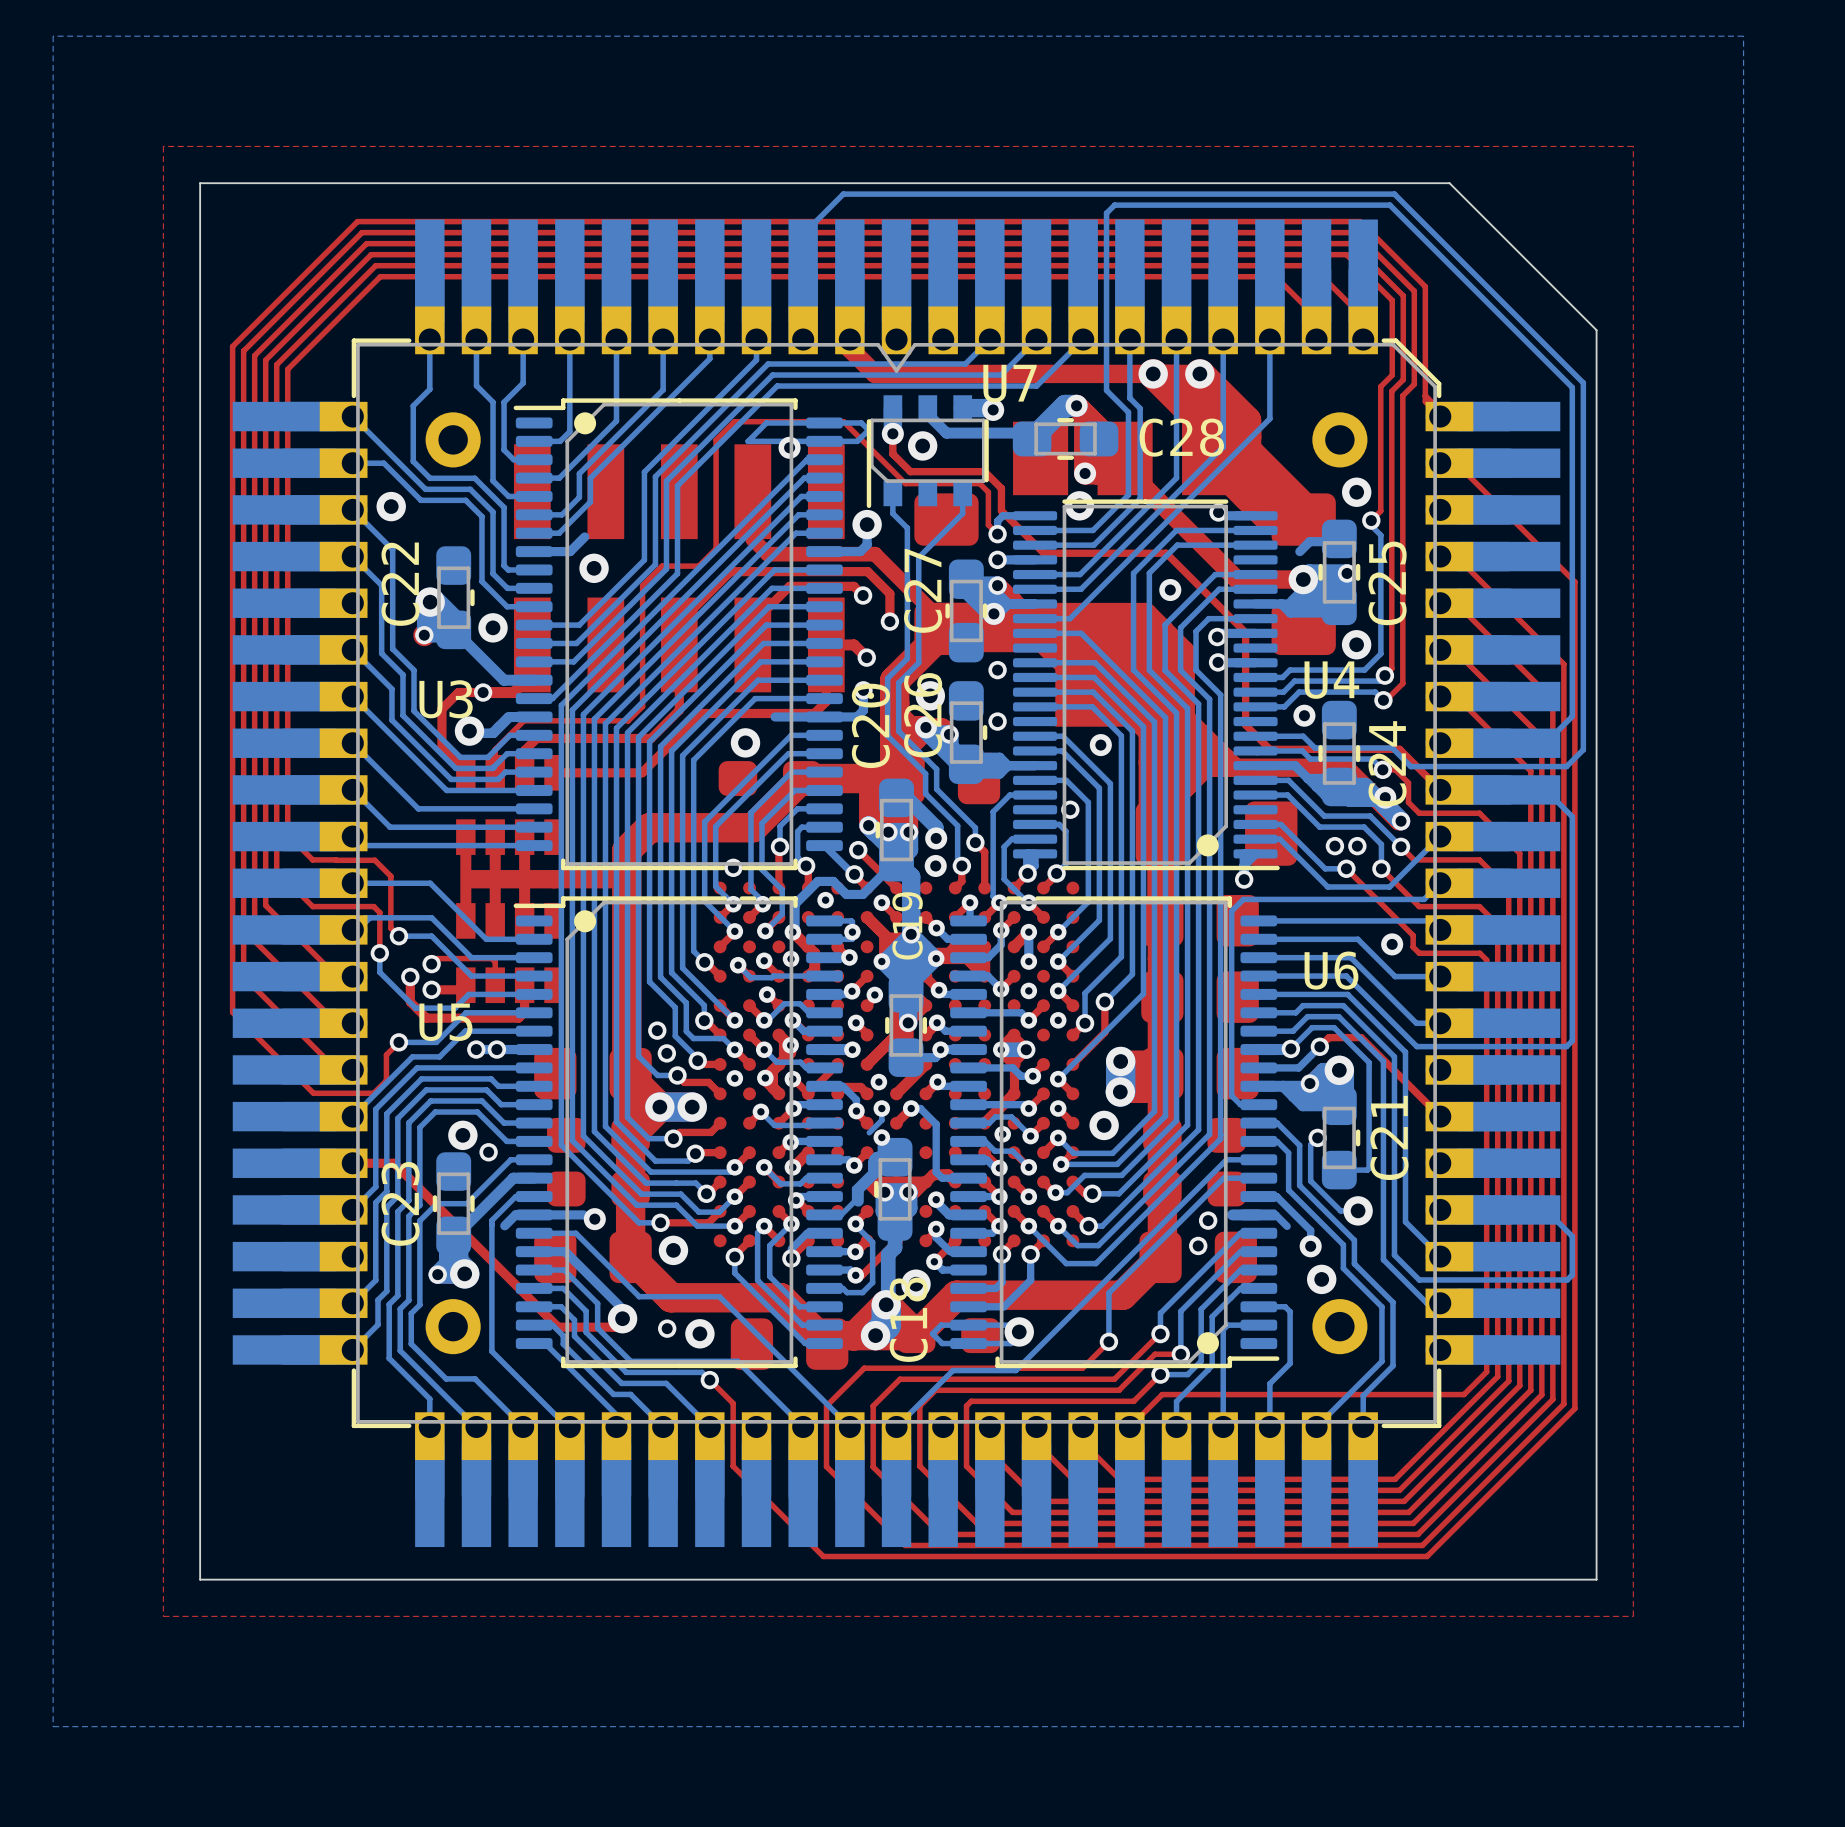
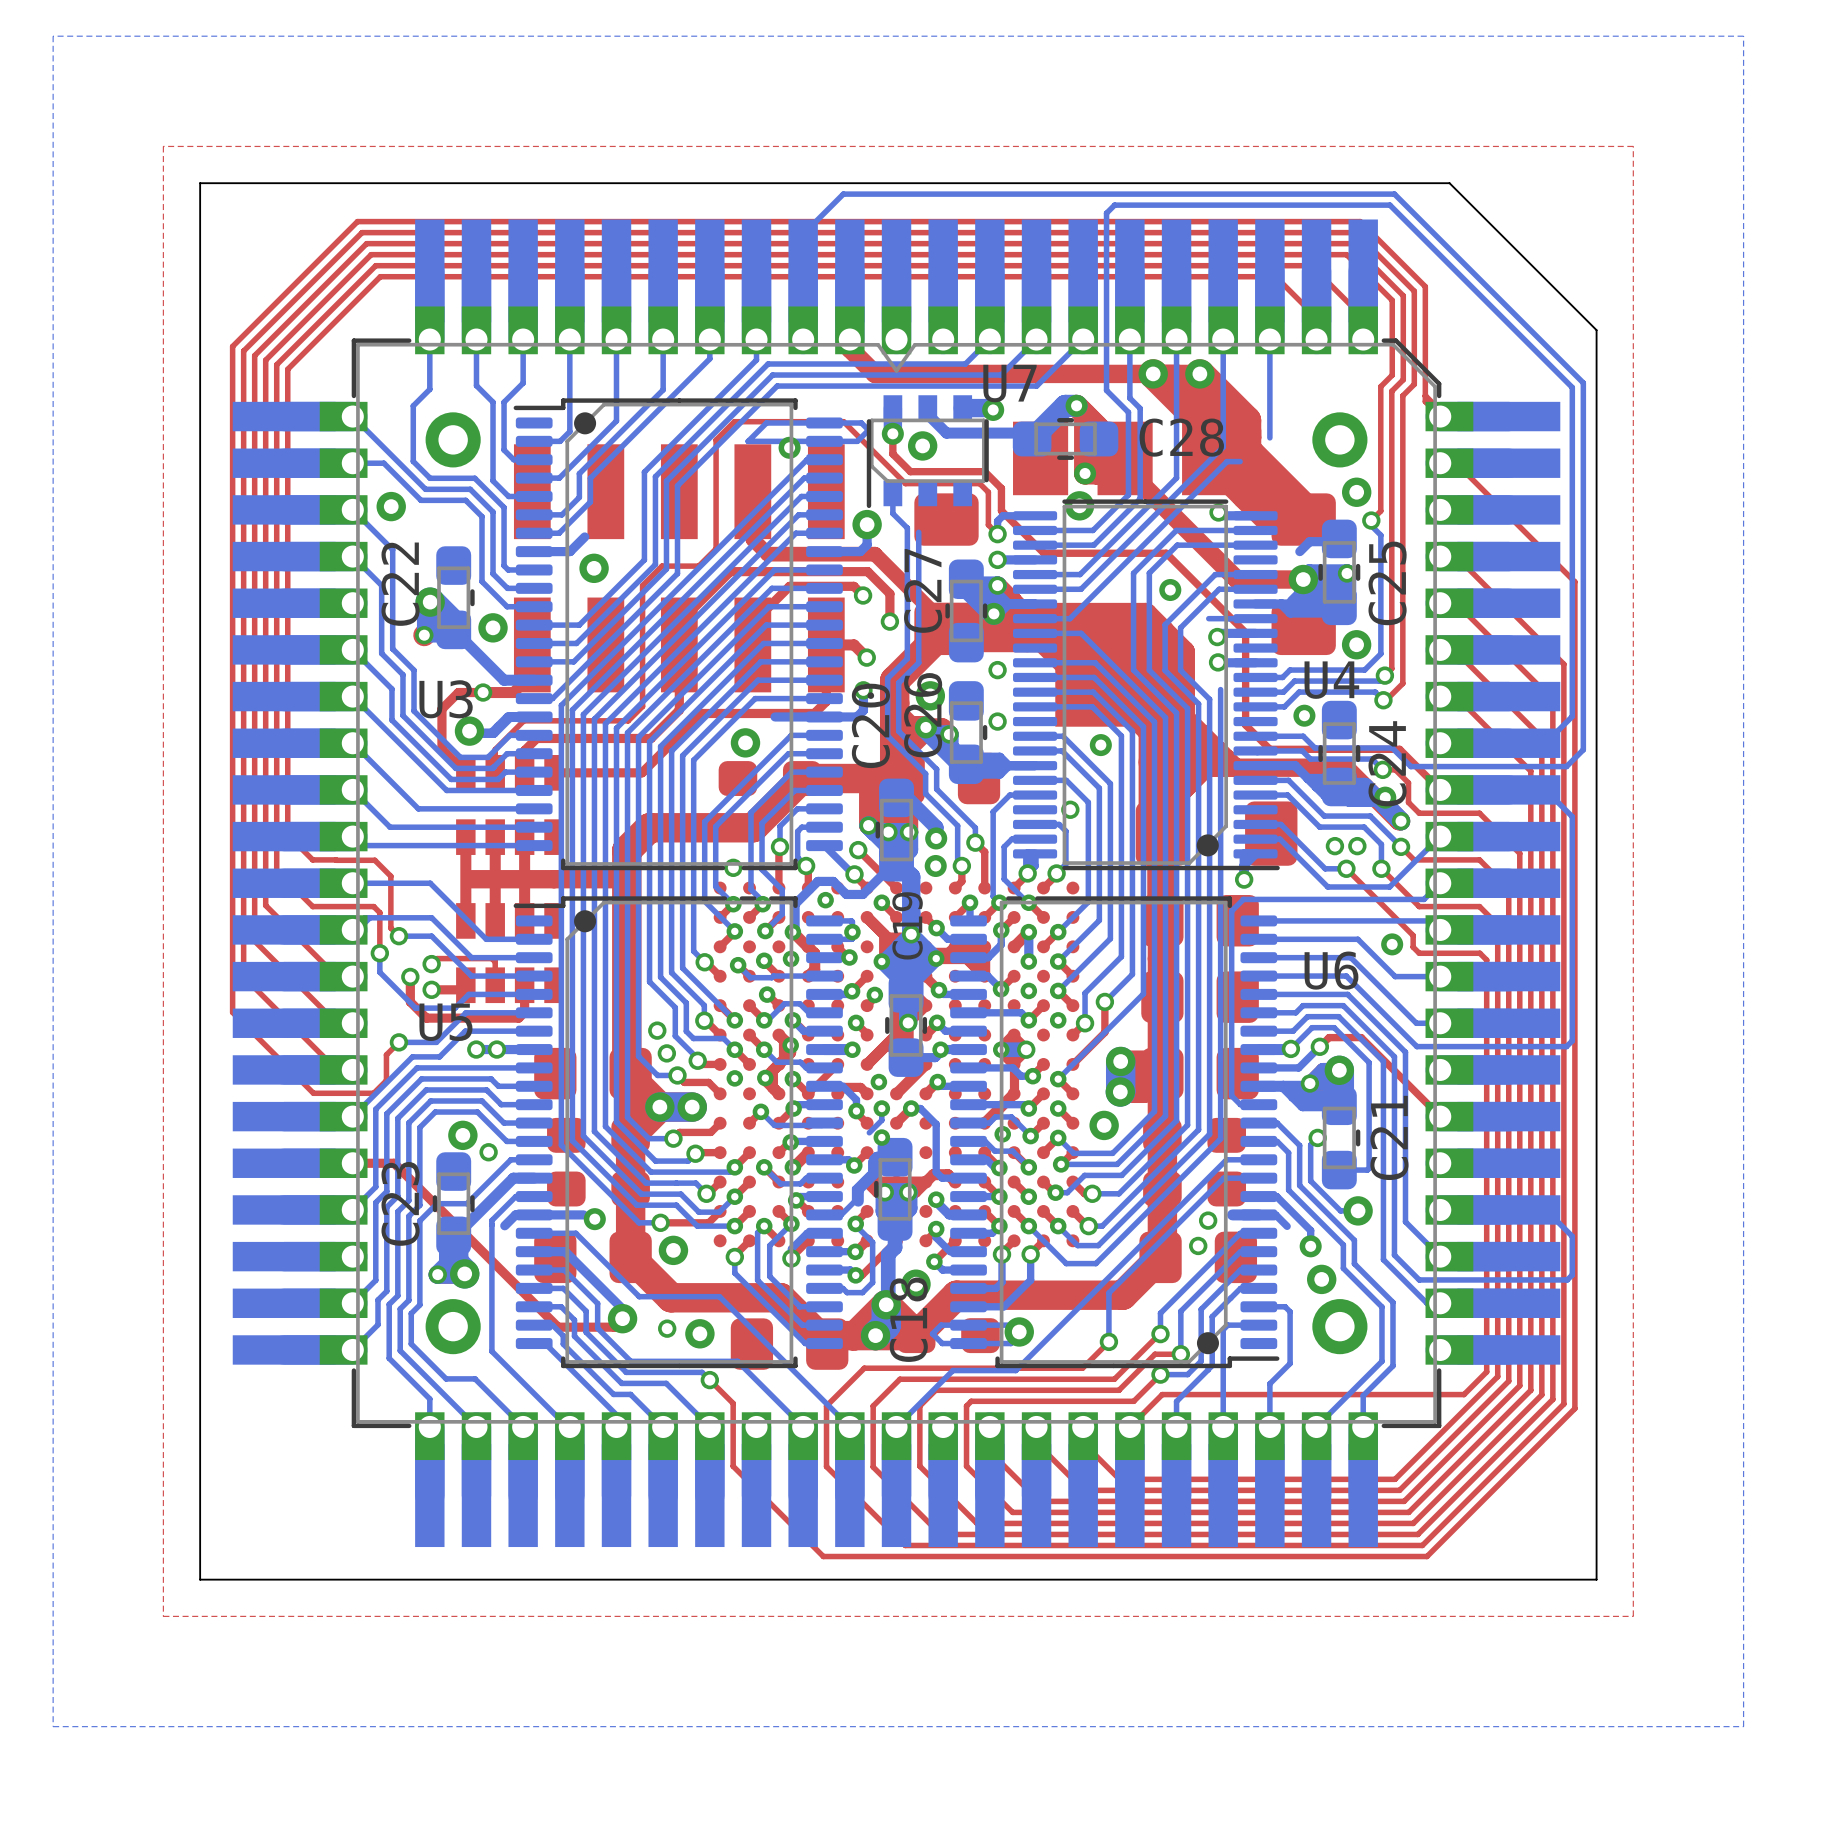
bottom track: (1269, 418) (1227, 461) -> (1269, 418) (1269, 437)
bottom track: none -> (1240, 461) (1227, 461)
bottom track: (962, 493) (962, 513) (918, 557) -> (918, 532) (918, 557)
bottom track: (1208, 618) (1196, 631) (1196, 670) (1220, 694) -> (1220, 689) (1220, 694)

